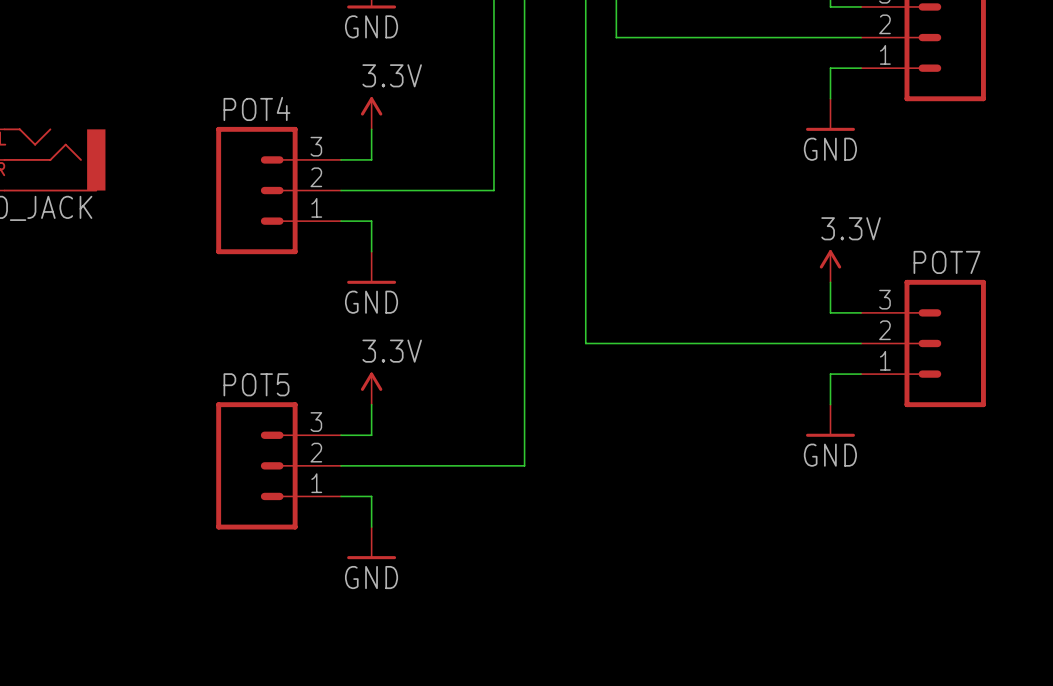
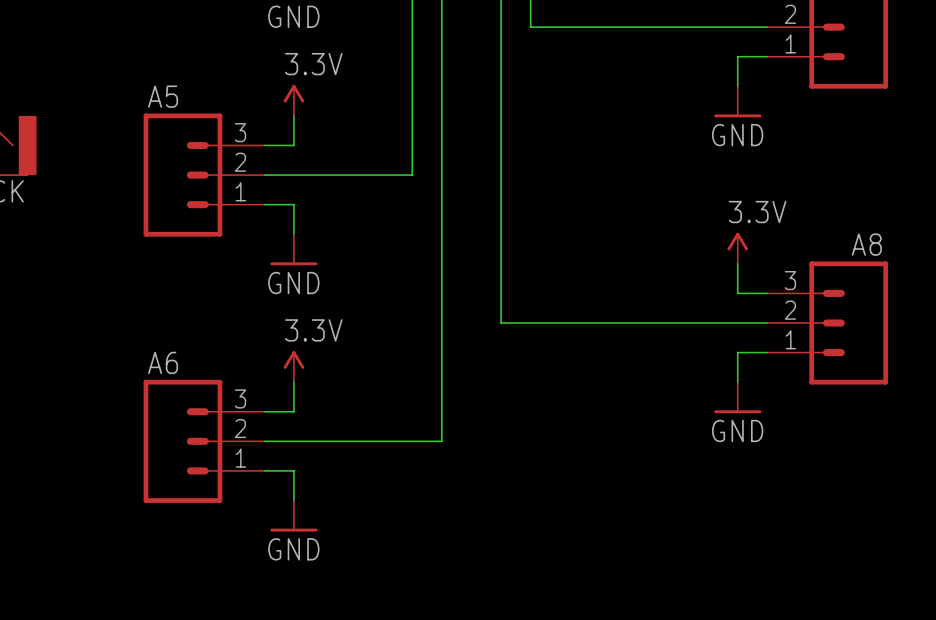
POT4 name: POT4 (256, 108) -> A5 (163, 96)
POT7 name: POT7 (946, 262) -> A8 (866, 244)
POT5 name: POT5 (256, 384) -> A6 (163, 362)

